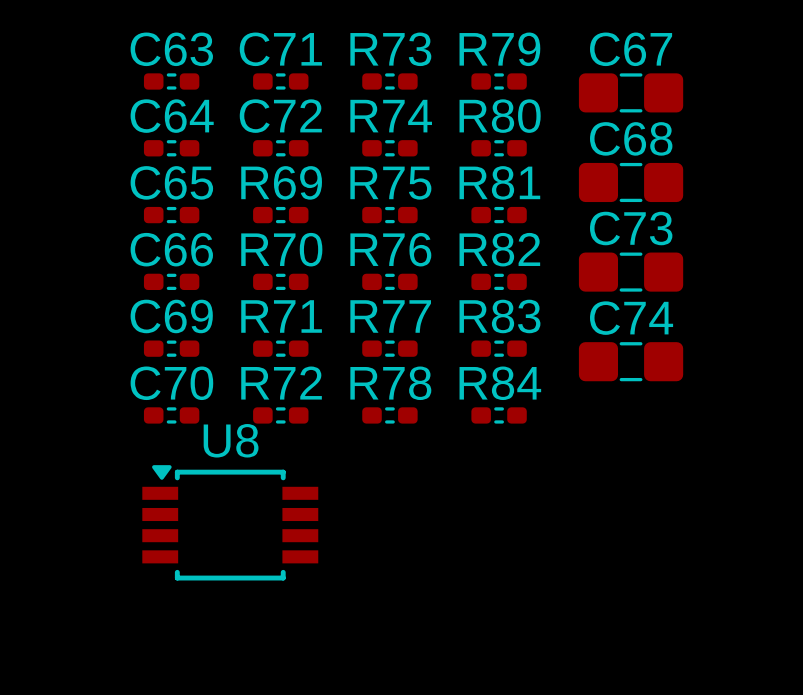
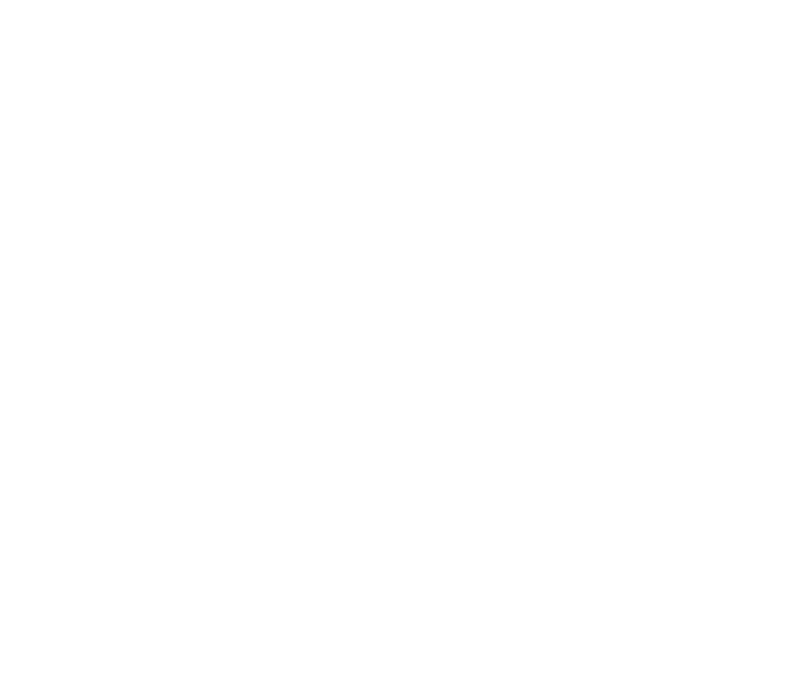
C63: (171, 81) -> none
C71: (280, 81) -> none
R73: (389, 81) -> none
R79: (499, 81) -> none
C67: (631, 92) -> none
C64: (171, 148) -> none
C72: (280, 148) -> none
R74: (389, 148) -> none
R80: (499, 148) -> none
C68: (631, 182) -> none
C65: (171, 215) -> none
R69: (280, 215) -> none
R75: (389, 215) -> none
R81: (499, 215) -> none
C73: (631, 272) -> none
C66: (171, 281) -> none
R70: (280, 281) -> none
R76: (389, 281) -> none
R82: (499, 281) -> none
C69: (171, 348) -> none
R71: (280, 348) -> none
R77: (389, 348) -> none
R83: (499, 348) -> none
C74: (631, 361) -> none
C70: (171, 415) -> none
R72: (280, 415) -> none
R78: (389, 415) -> none
R84: (499, 415) -> none
U8: (230, 522) -> none

